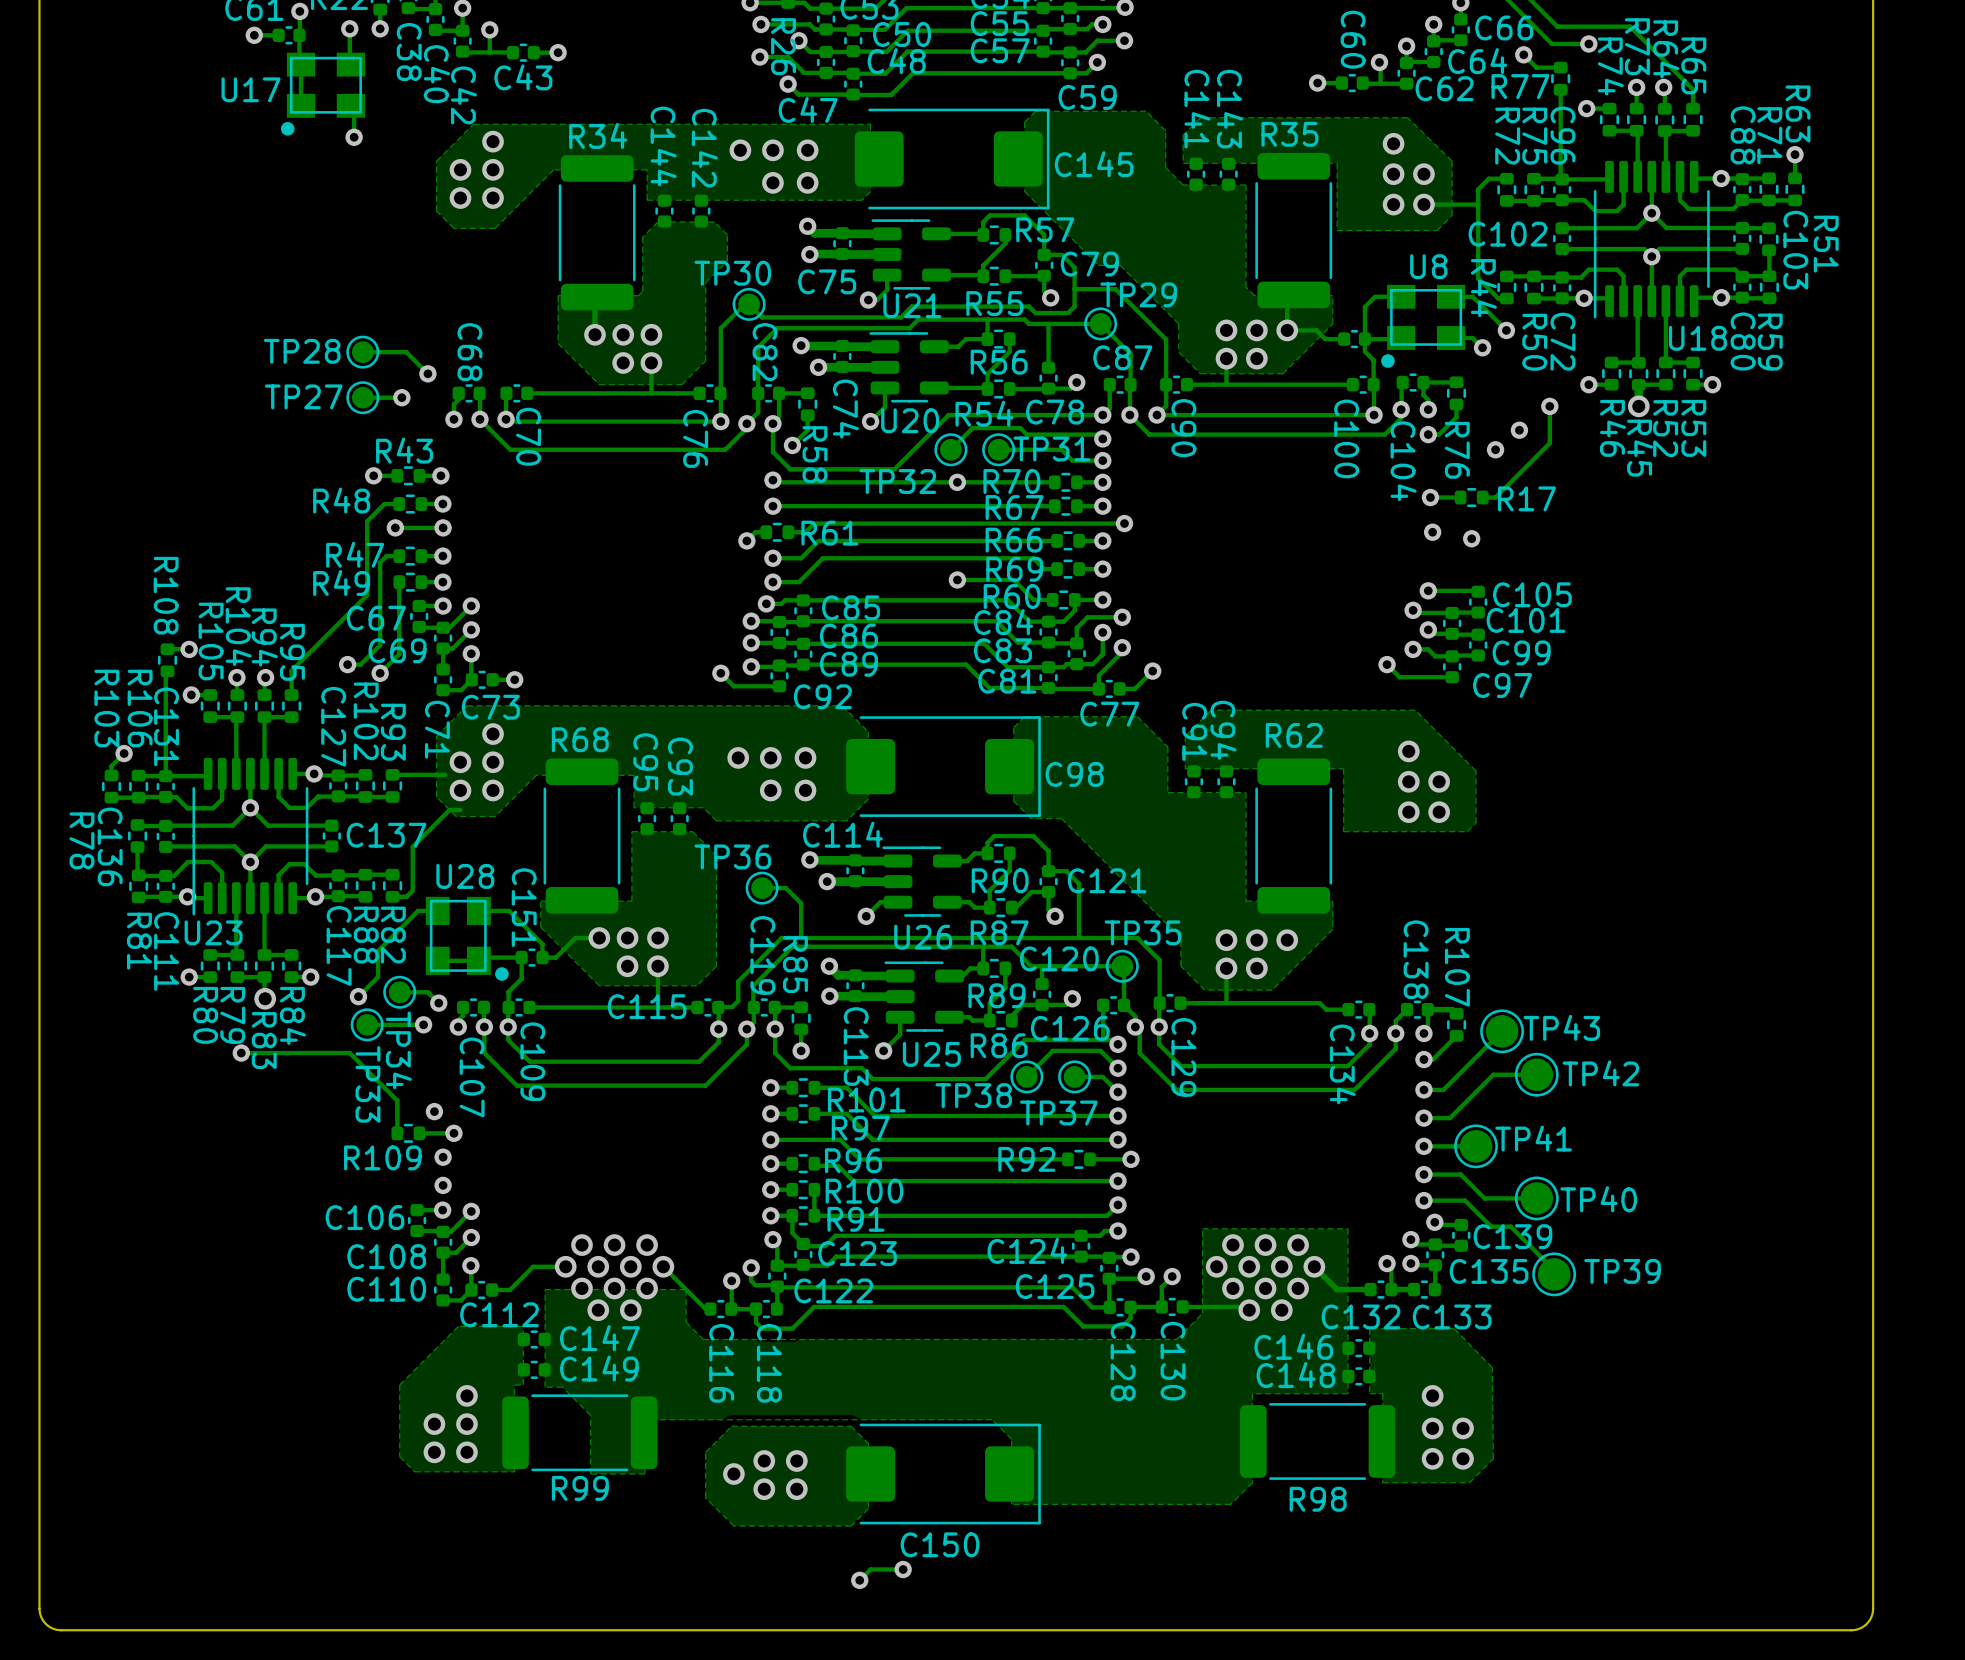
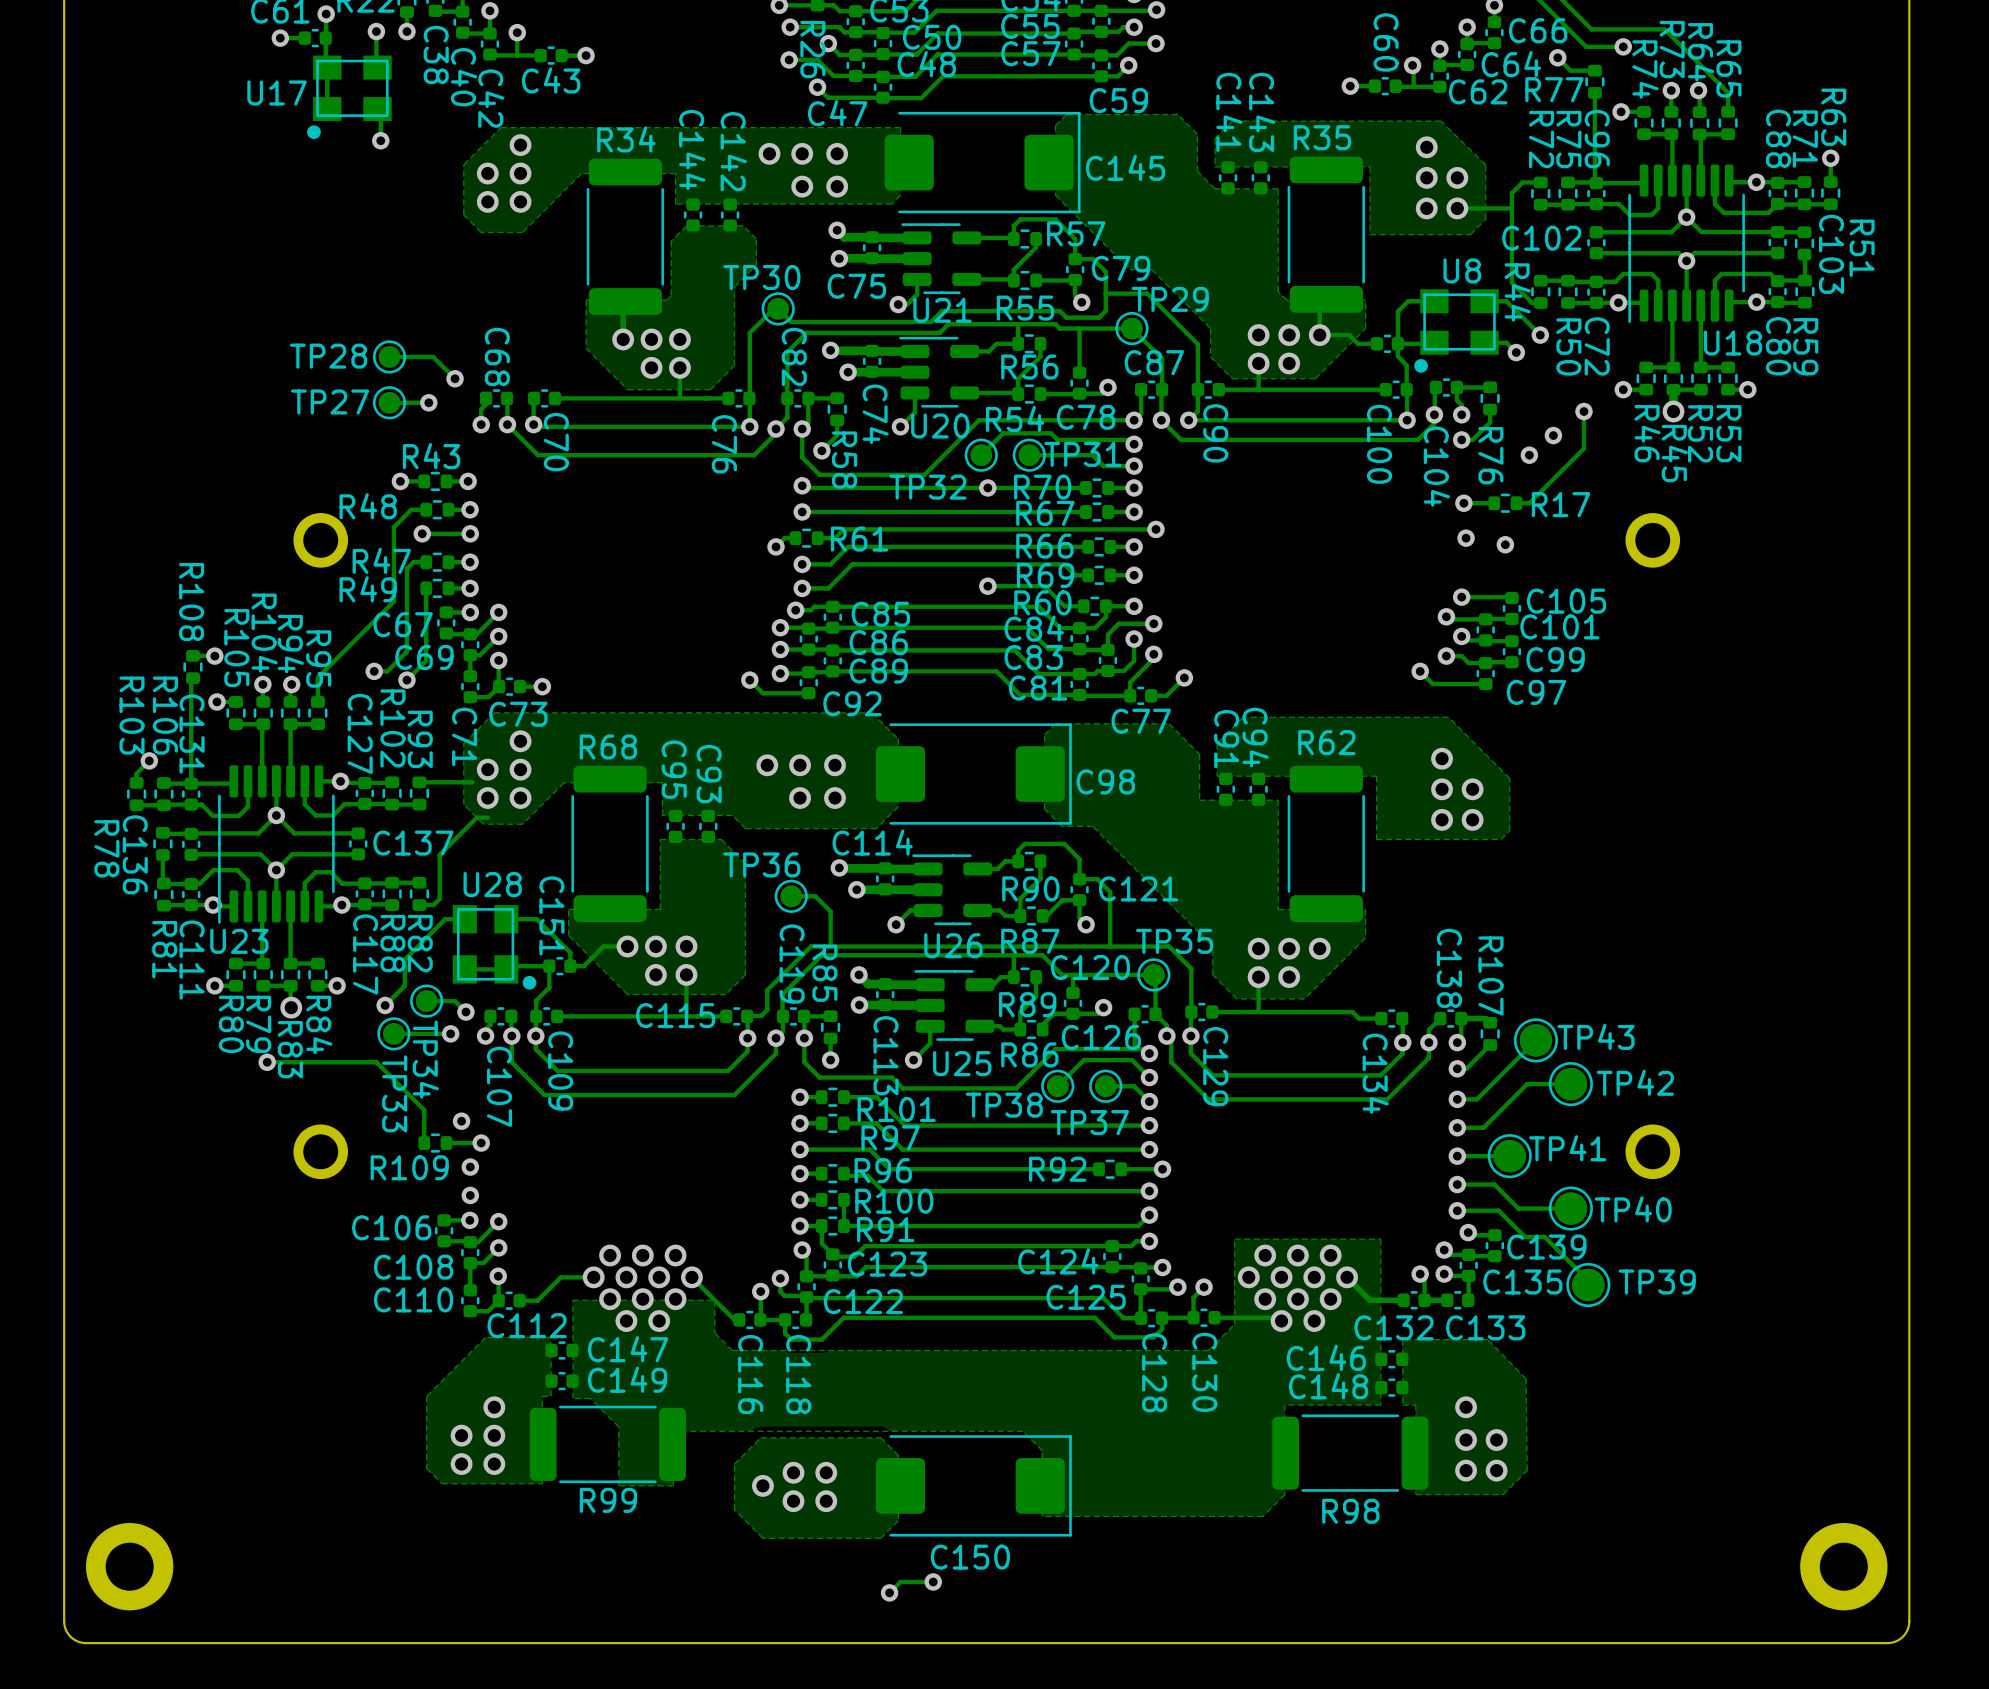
part: none -> (320, 540)
part: none -> (1652, 540)
part: none -> (320, 1151)
part: none -> (1652, 1151)
part: none -> (129, 1566)
part: none -> (1843, 1566)

